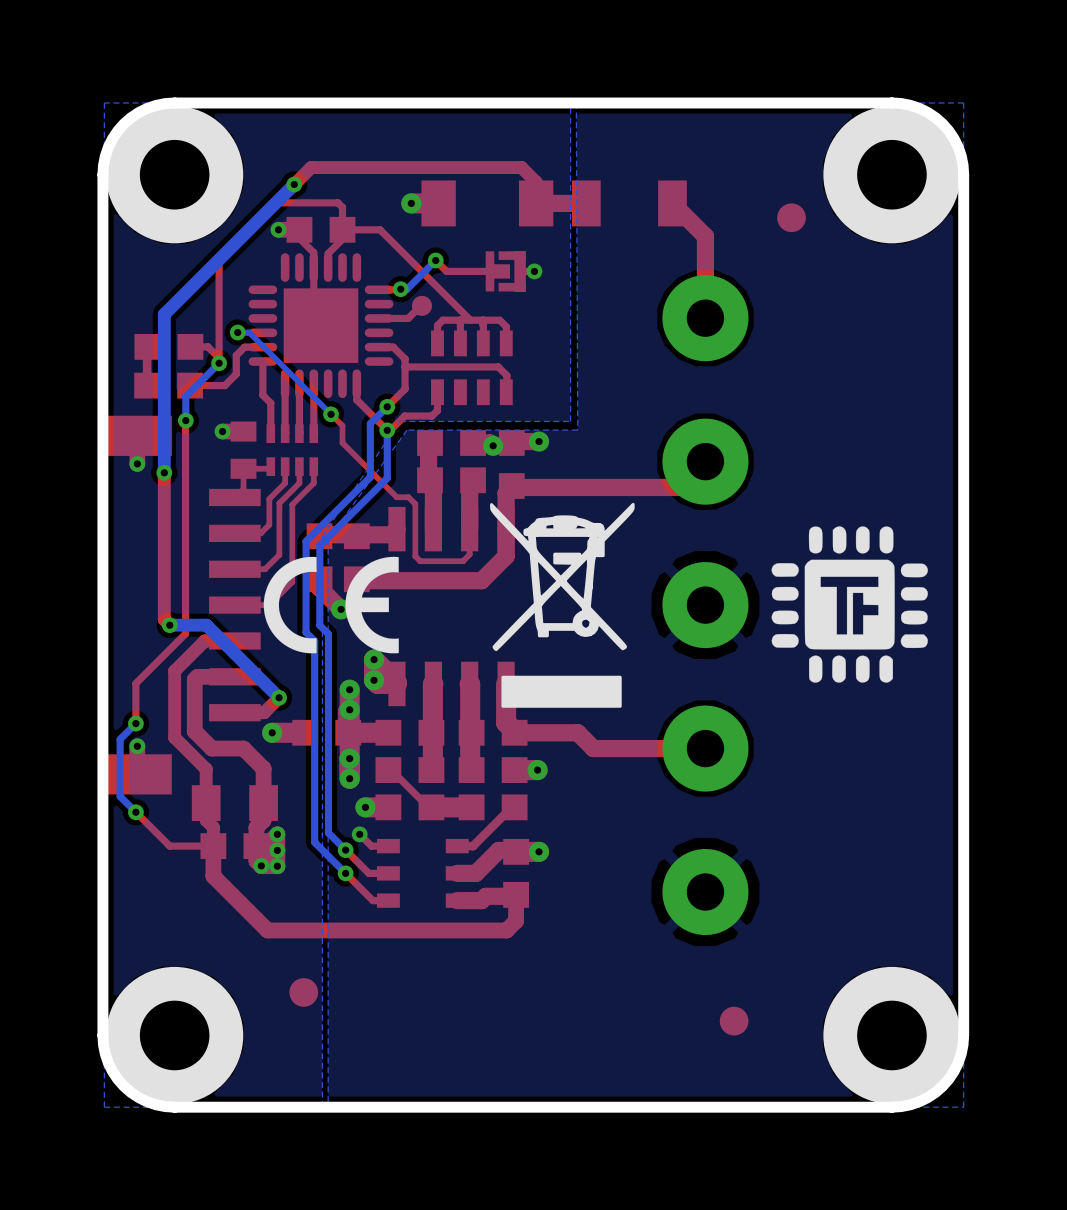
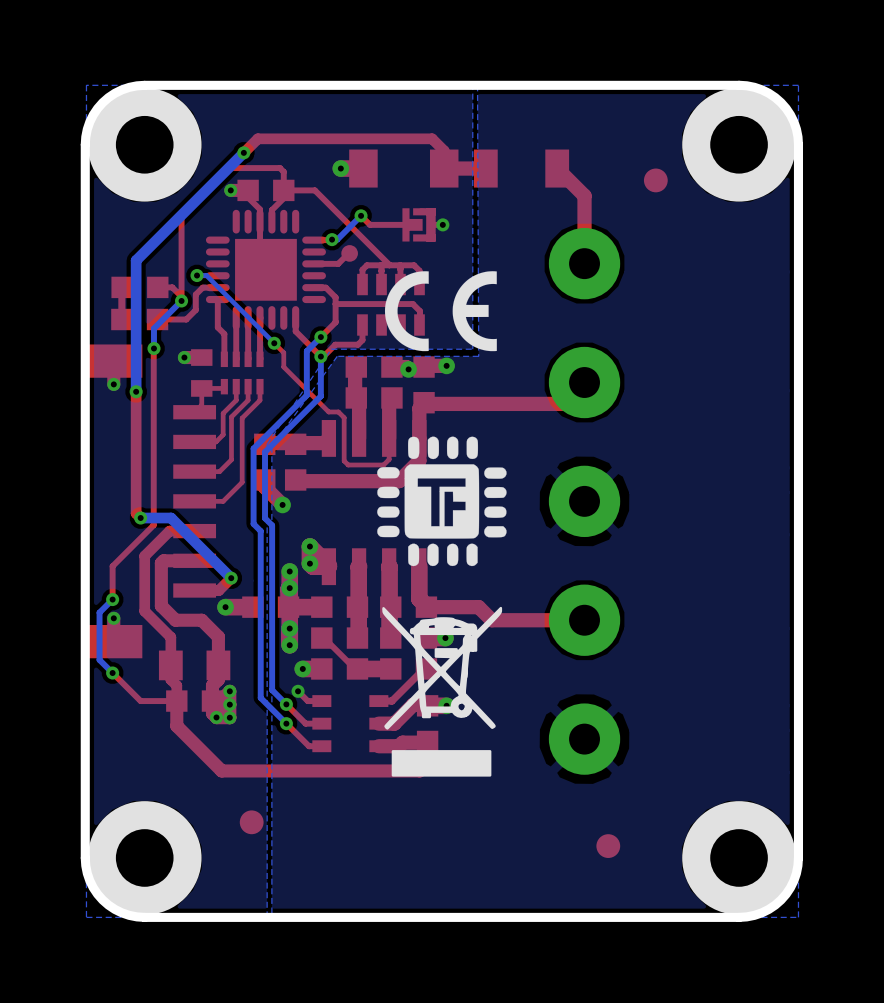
drawing position: (849, 604) -> (441, 501)
drawing position: (331, 605) -> (440, 311)
drawing position: (562, 605) -> (442, 691)

